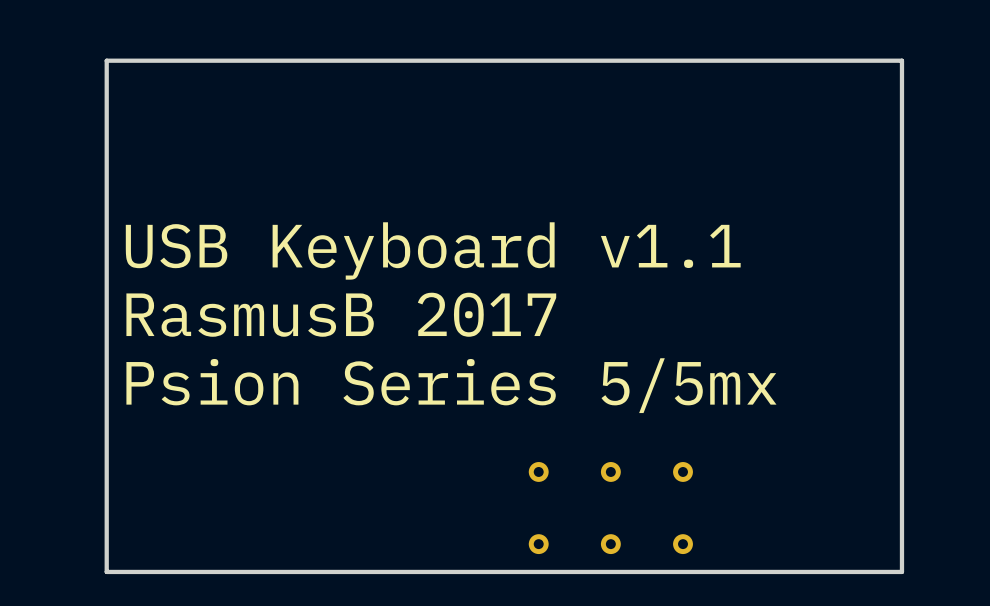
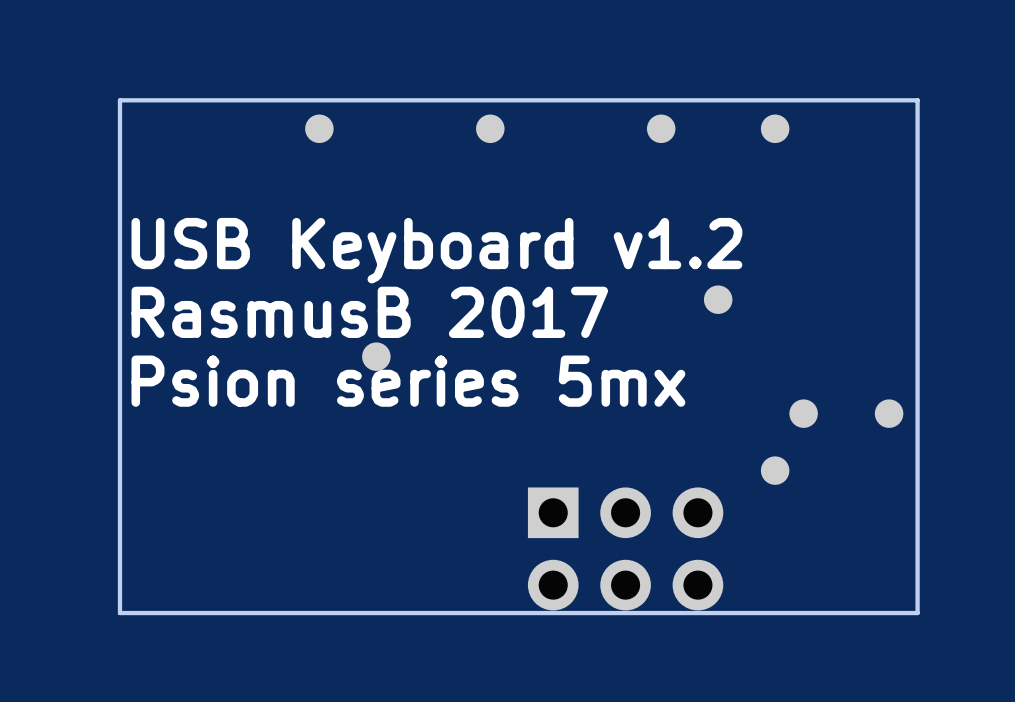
part: none -> (319, 128)
part: none -> (490, 128)
part: none -> (661, 128)
part: none -> (775, 128)
text: USB Keyboard v1.1 (433, 250) -> USB Keyboard v1.2 (436, 250)
part: none -> (718, 299)
text position: RasmusB 2017 (341, 314) -> RasmusB 2017 (369, 312)
part: none -> (376, 356)
part: none -> (803, 413)
part: none -> (889, 413)
text: Psion Series 5/5mx (451, 385) -> Psion series 5mx (408, 381)
part: none -> (775, 470)
part footprint: [528, 462, 693, 555] -> [527, 487, 724, 611]

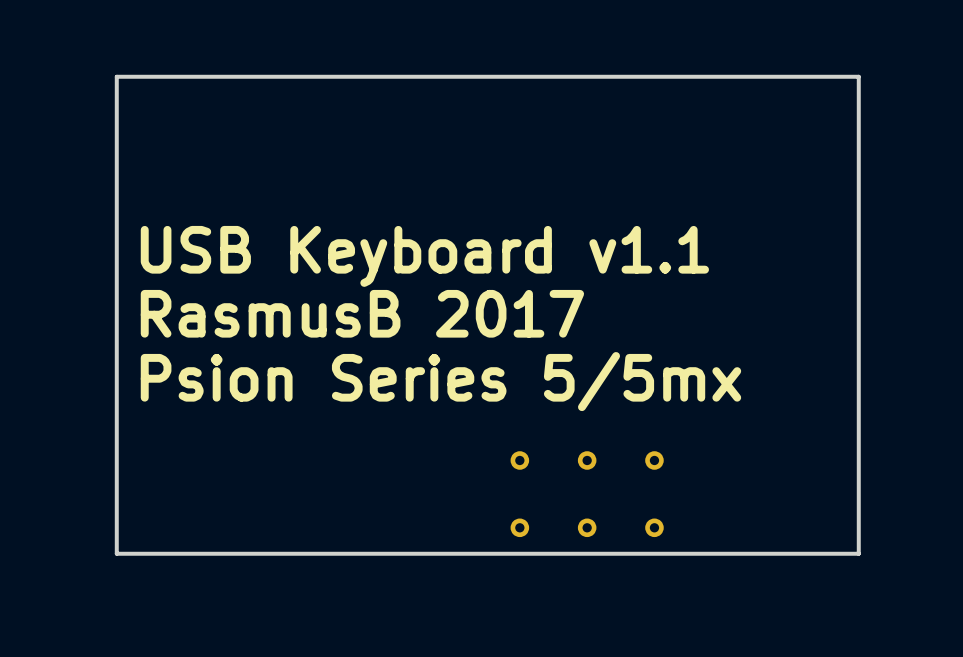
part: (319, 128) -> none
part: (490, 128) -> none
part: (661, 128) -> none
part: (775, 128) -> none
text: USB Keyboard v1.2 (436, 250) -> USB Keyboard v1.1 (424, 256)
part: (718, 299) -> none
text position: RasmusB 2017 (369, 312) -> RasmusB 2017 (362, 313)
part: (376, 356) -> none
text: Psion series 5mx (408, 381) -> Psion Series 5/5mx (440, 381)
part: (803, 413) -> none
part: (889, 413) -> none
part: (775, 470) -> none
part footprint: [527, 487, 724, 611] -> [510, 451, 664, 538]

